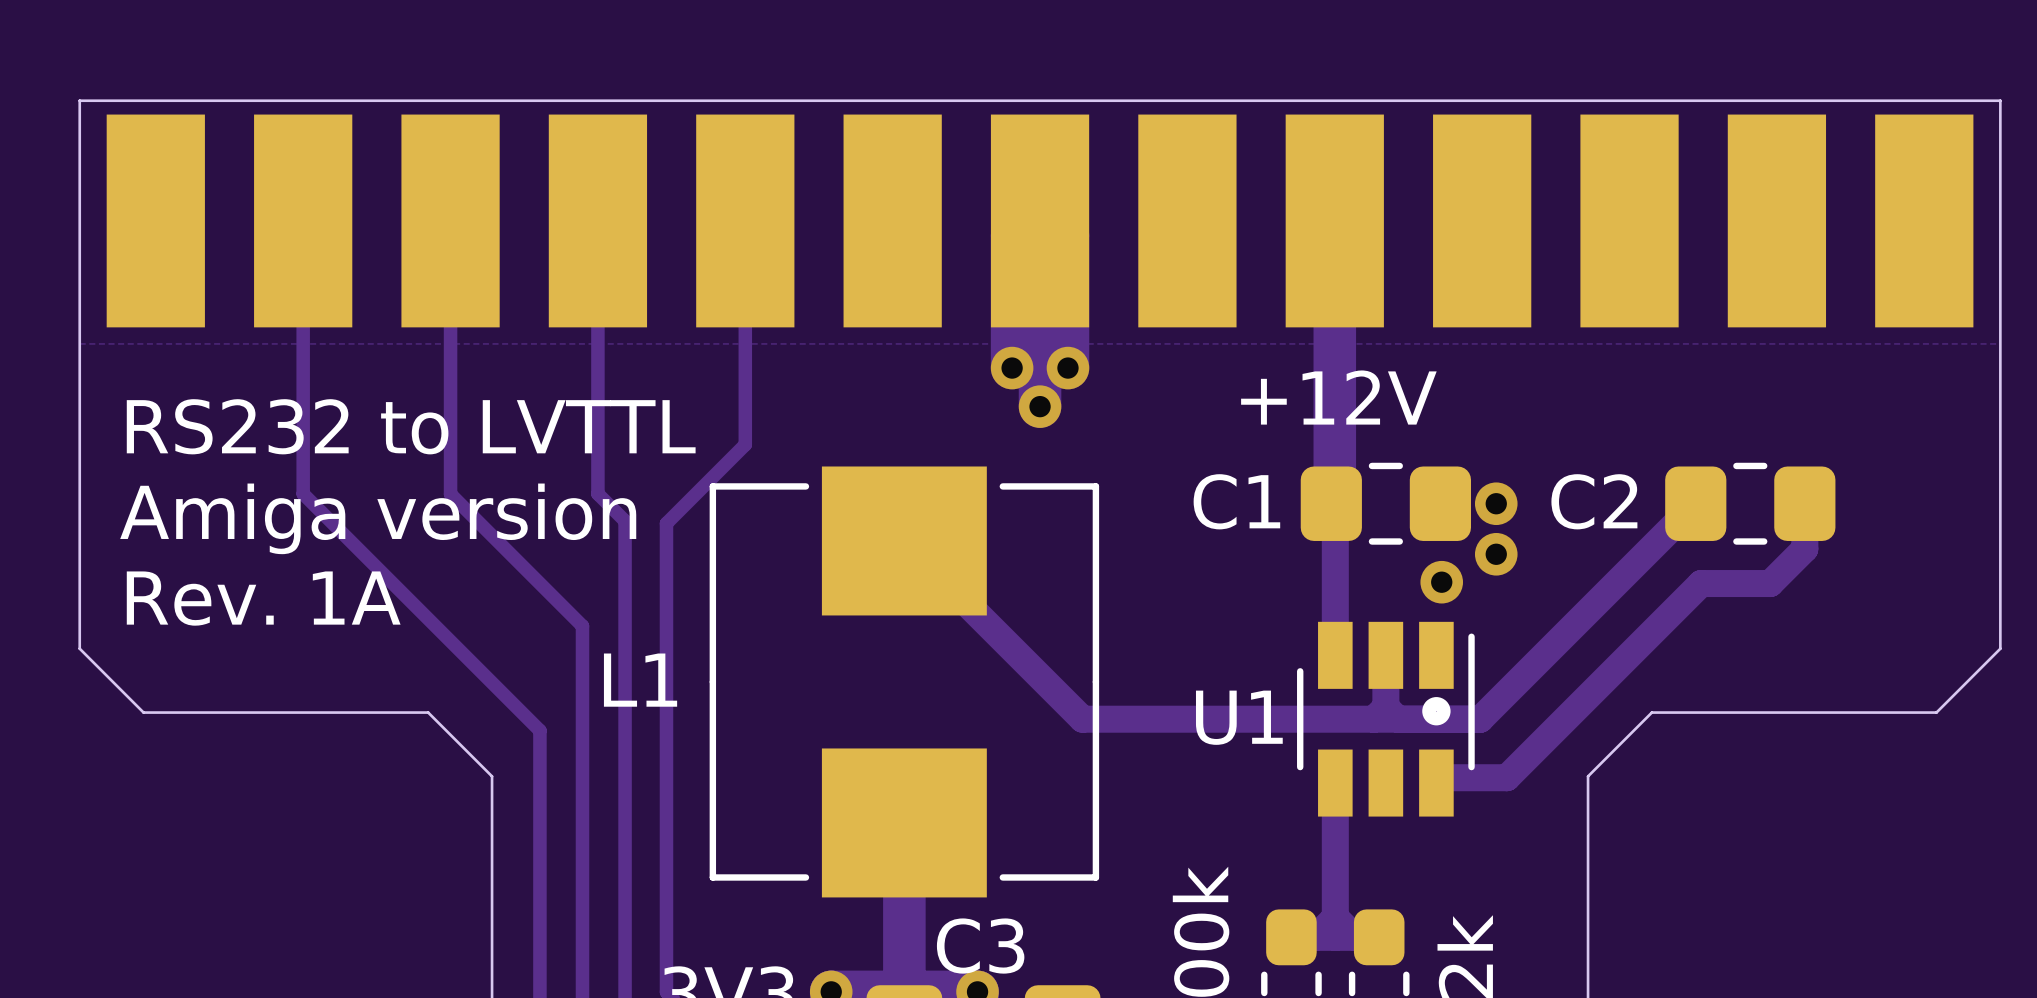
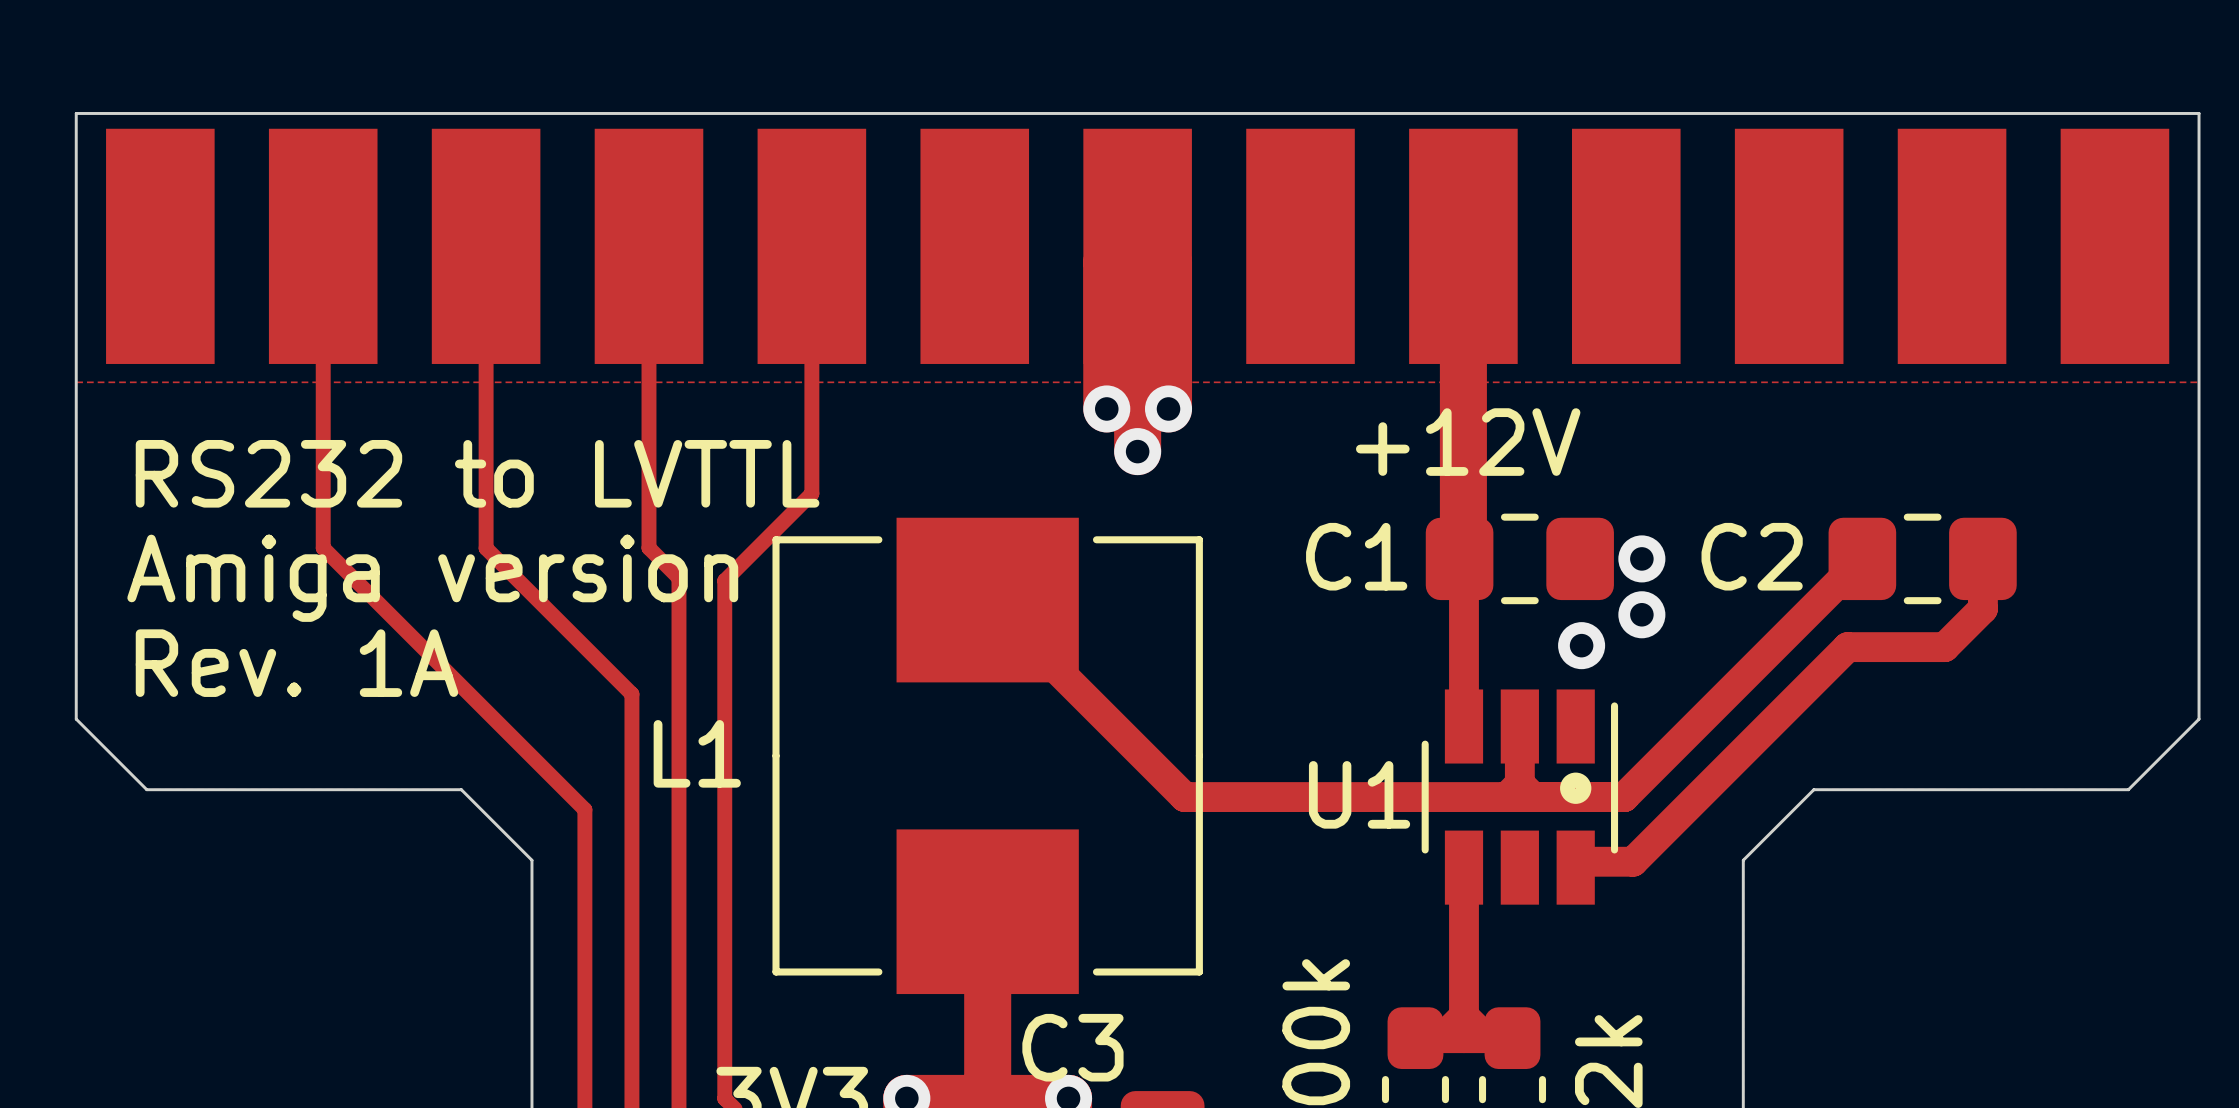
track: (1701, 583) (1506, 777) (1488, 777) -> (1868, 647) (1847, 647) (1633, 861)

